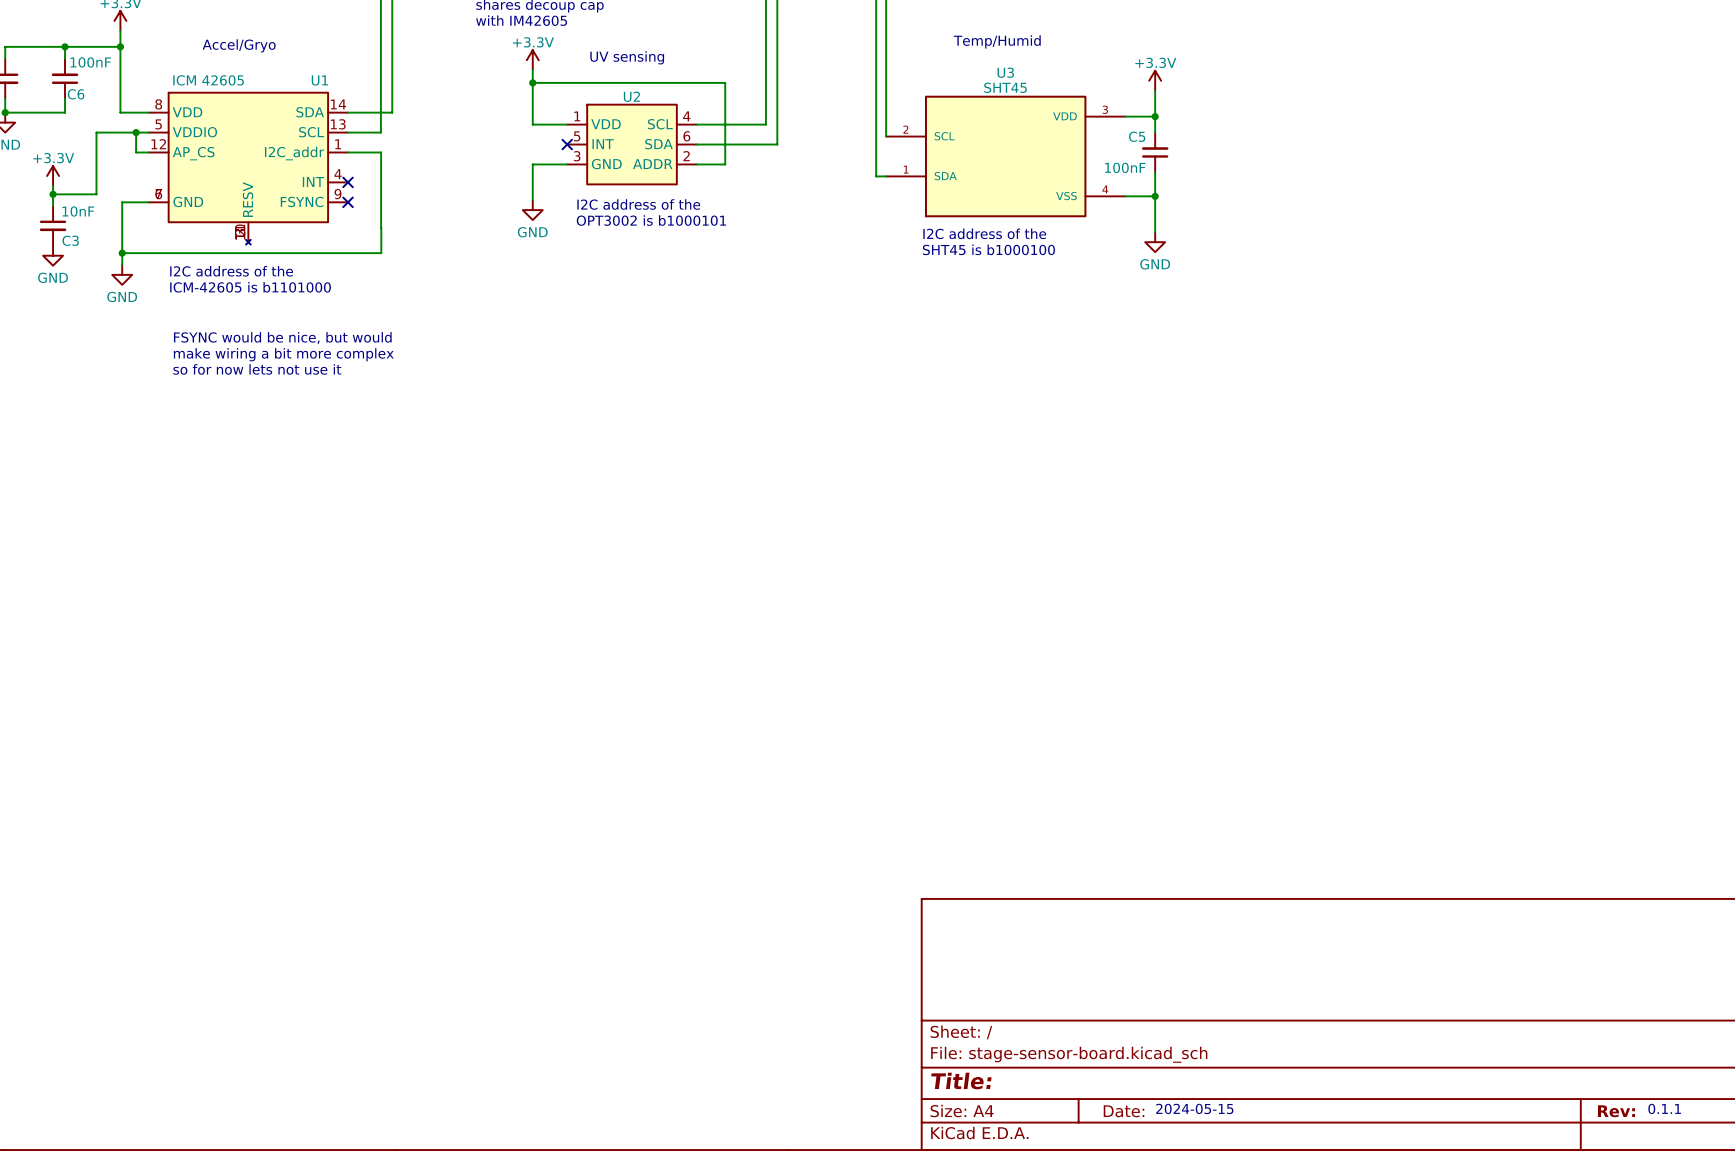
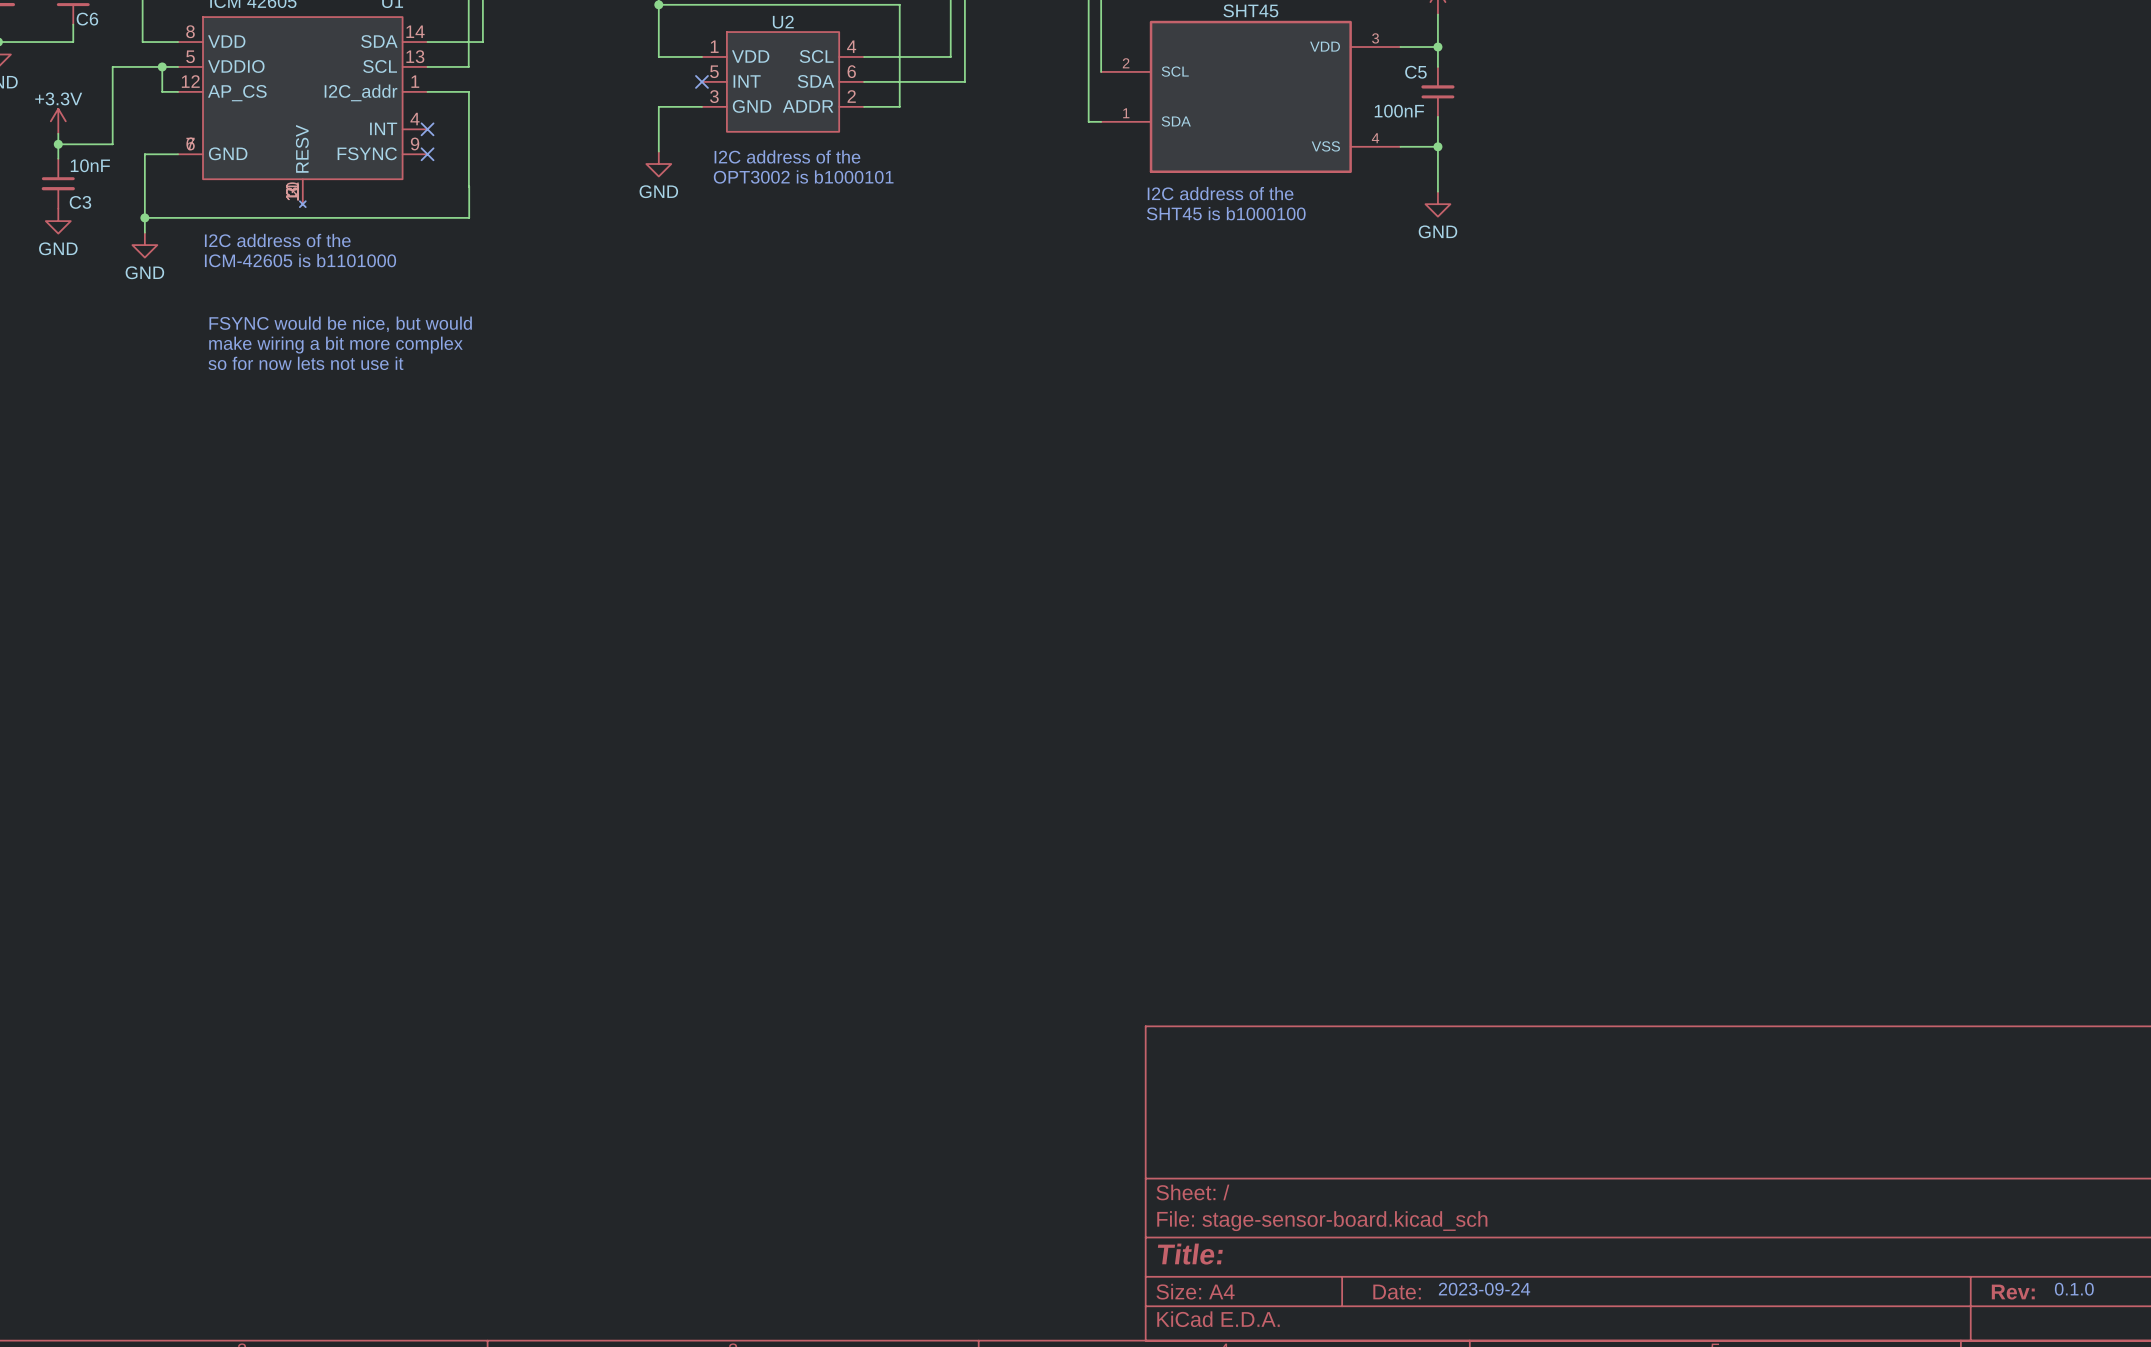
text: 2024-05-15 (1194, 1108) -> 2023-09-24 (1484, 1289)
text: 0.1.1 (1664, 1108) -> 0.1.0 (2074, 1289)

